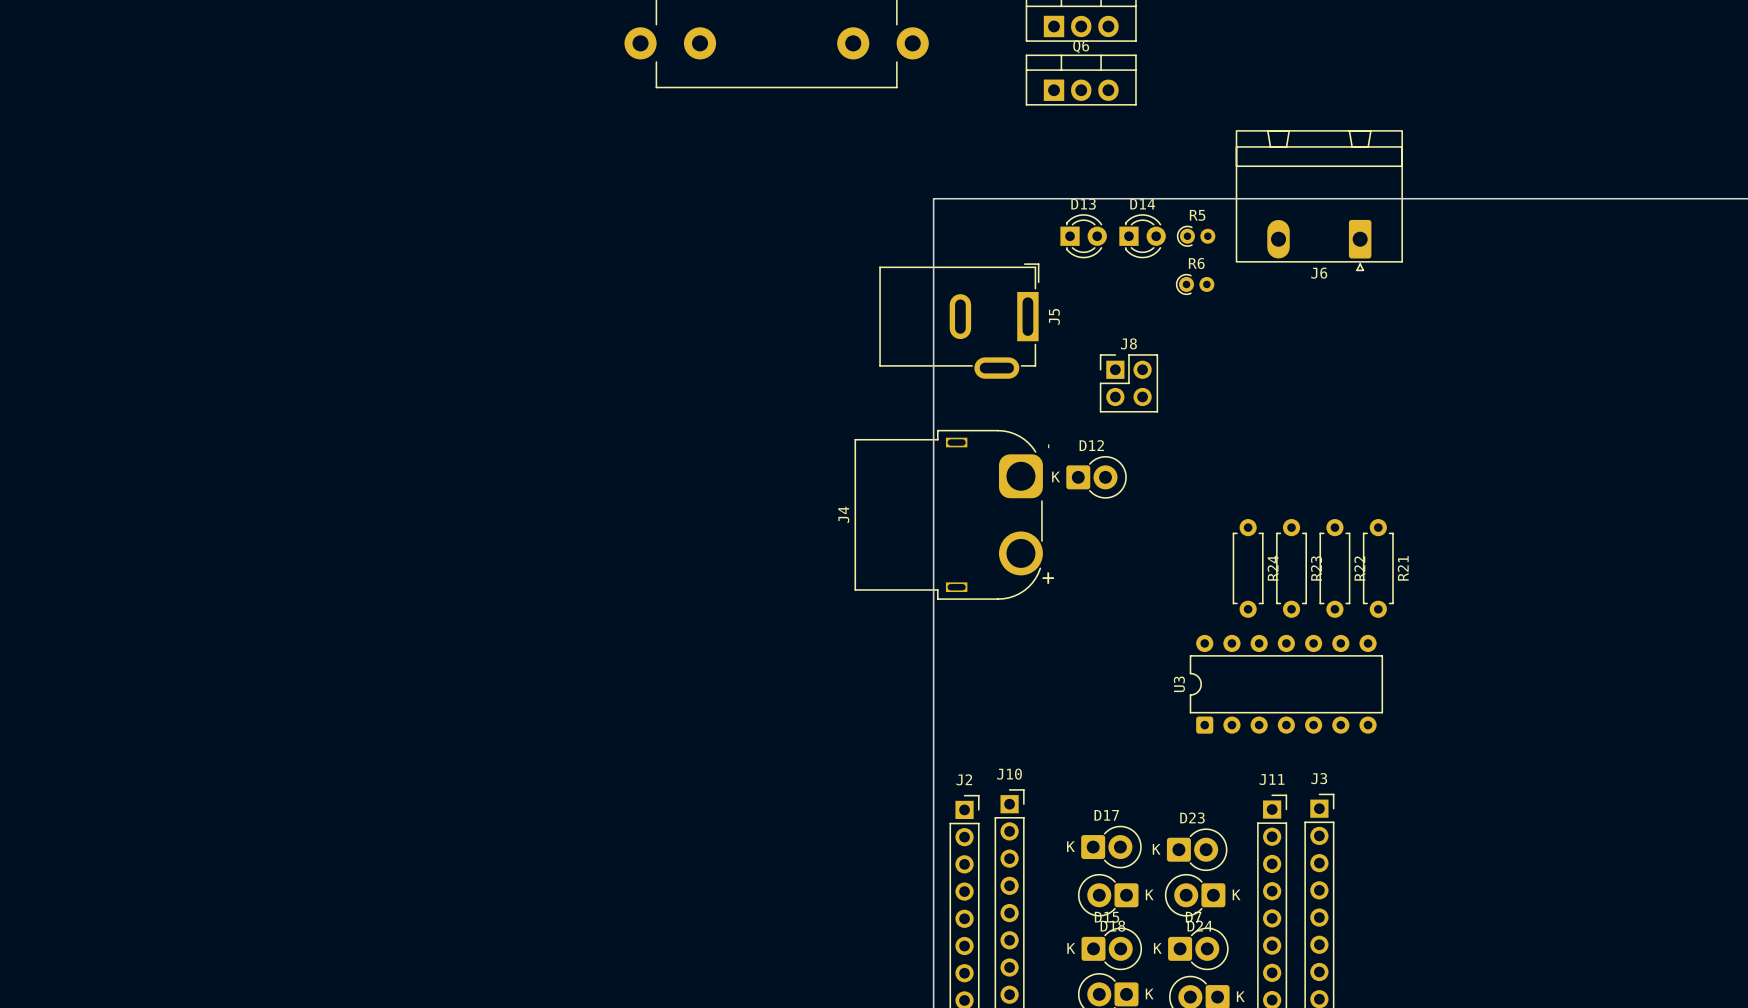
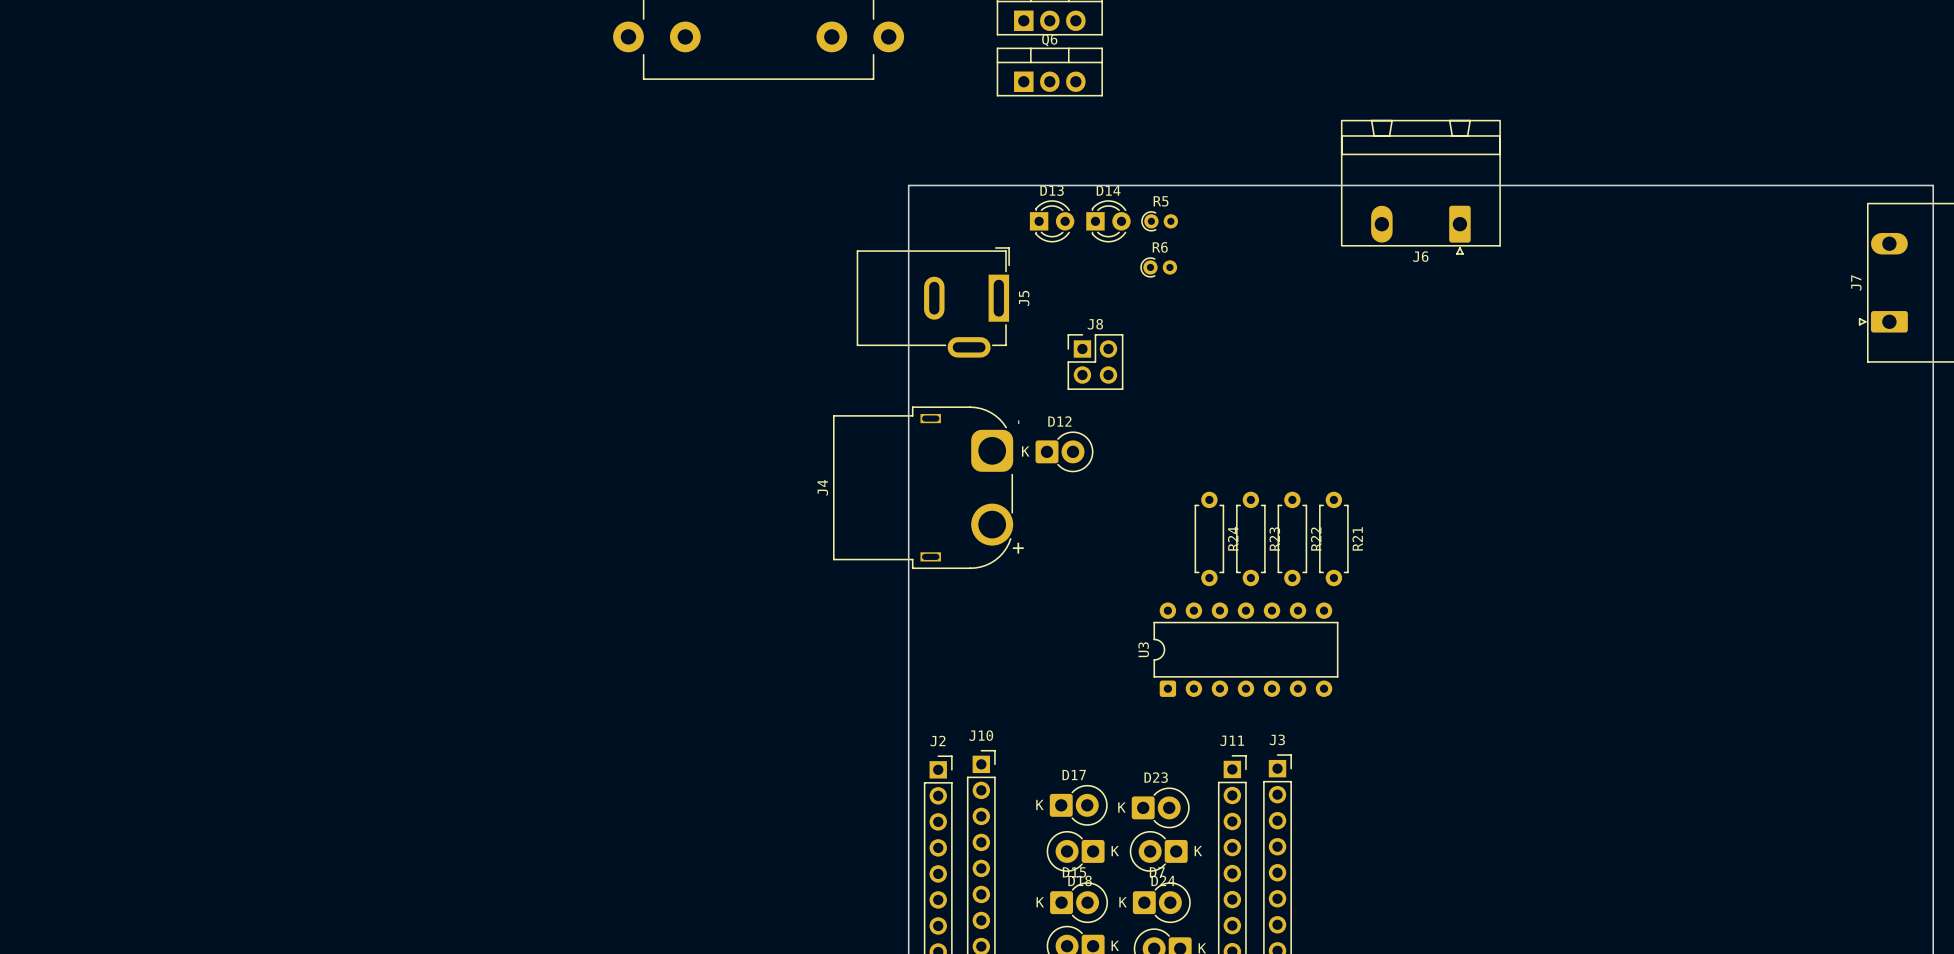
J6 position: (1319, 200) -> (1420, 187)

